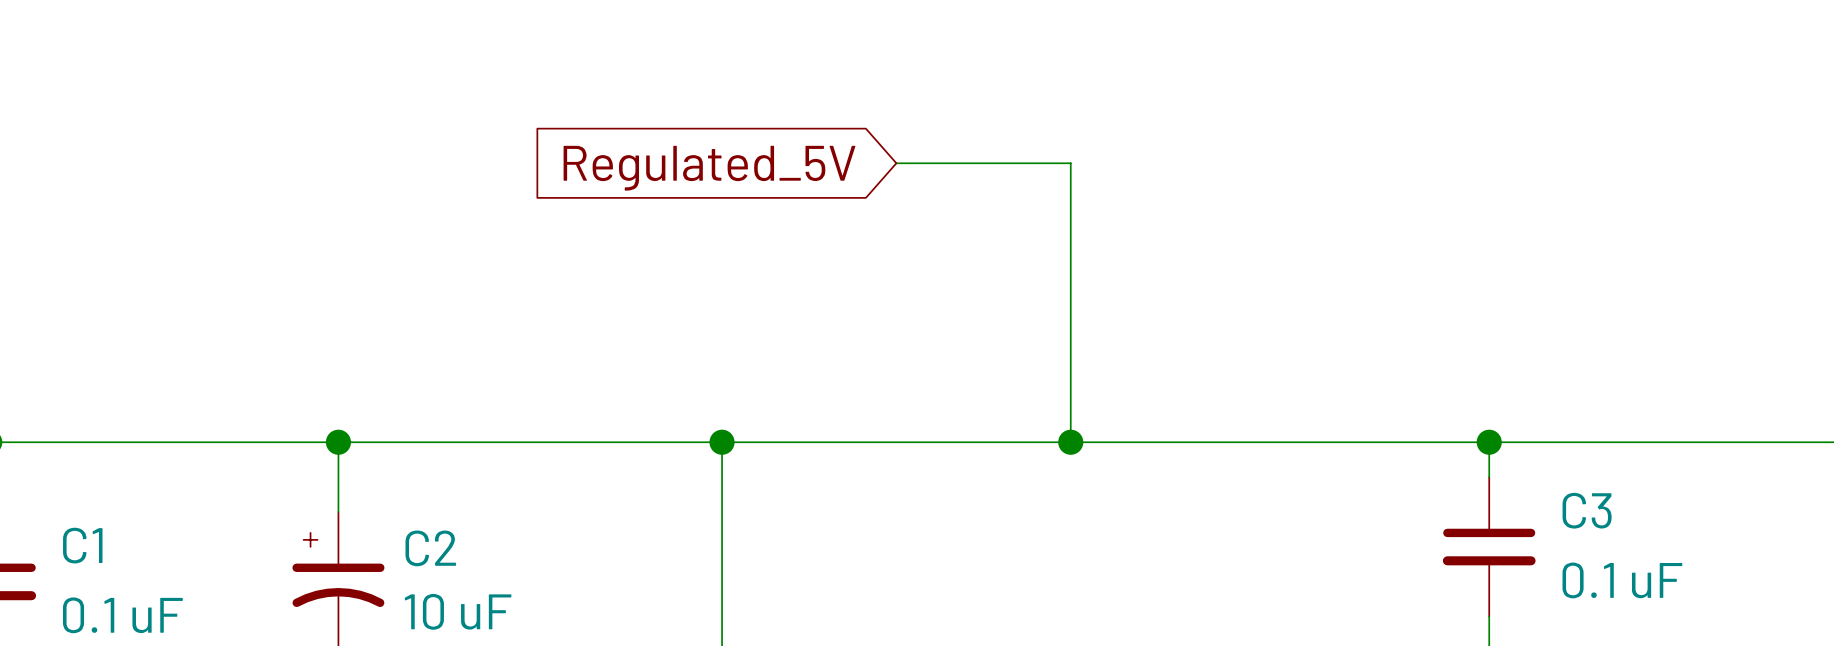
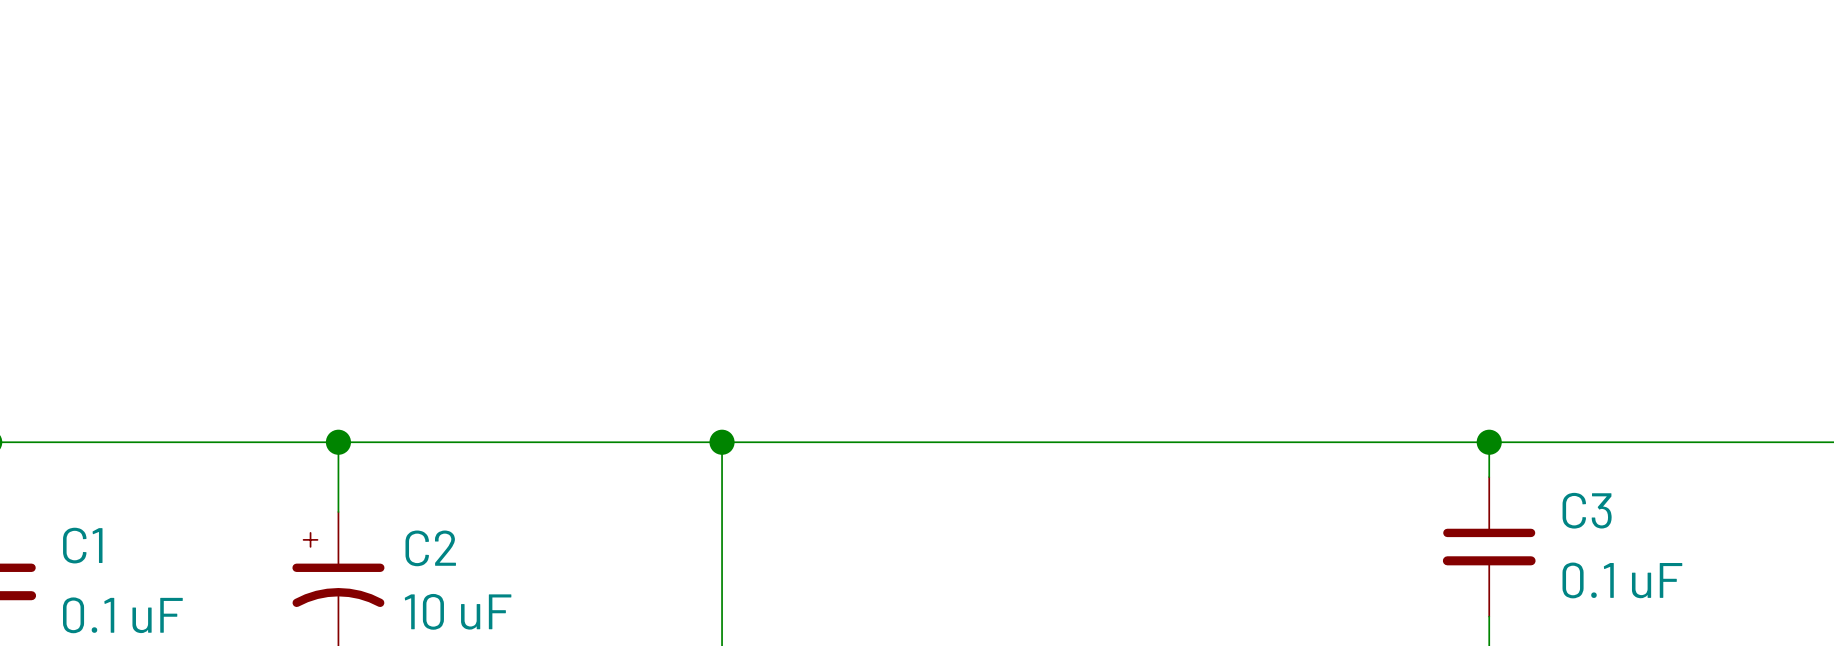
wire: (896, 163) (1070, 163) (1070, 442) -> none
global label: Regulated_5V (709, 168) -> none
junction: (1070, 442) -> none

